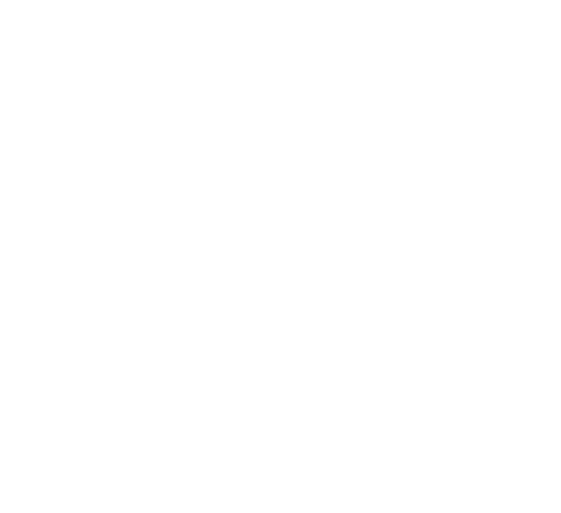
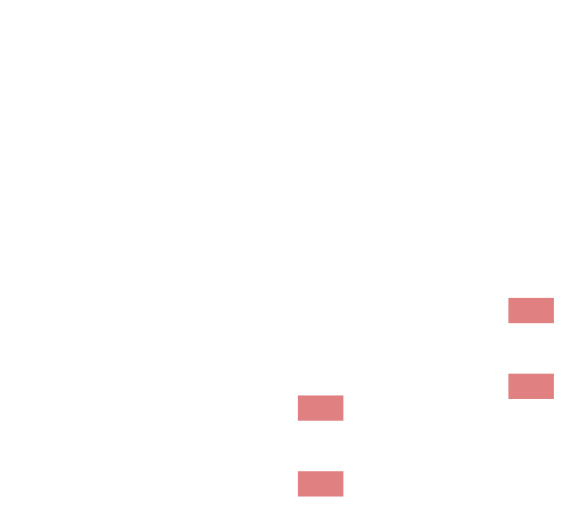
part: none -> (531, 348)
part: none -> (320, 445)

